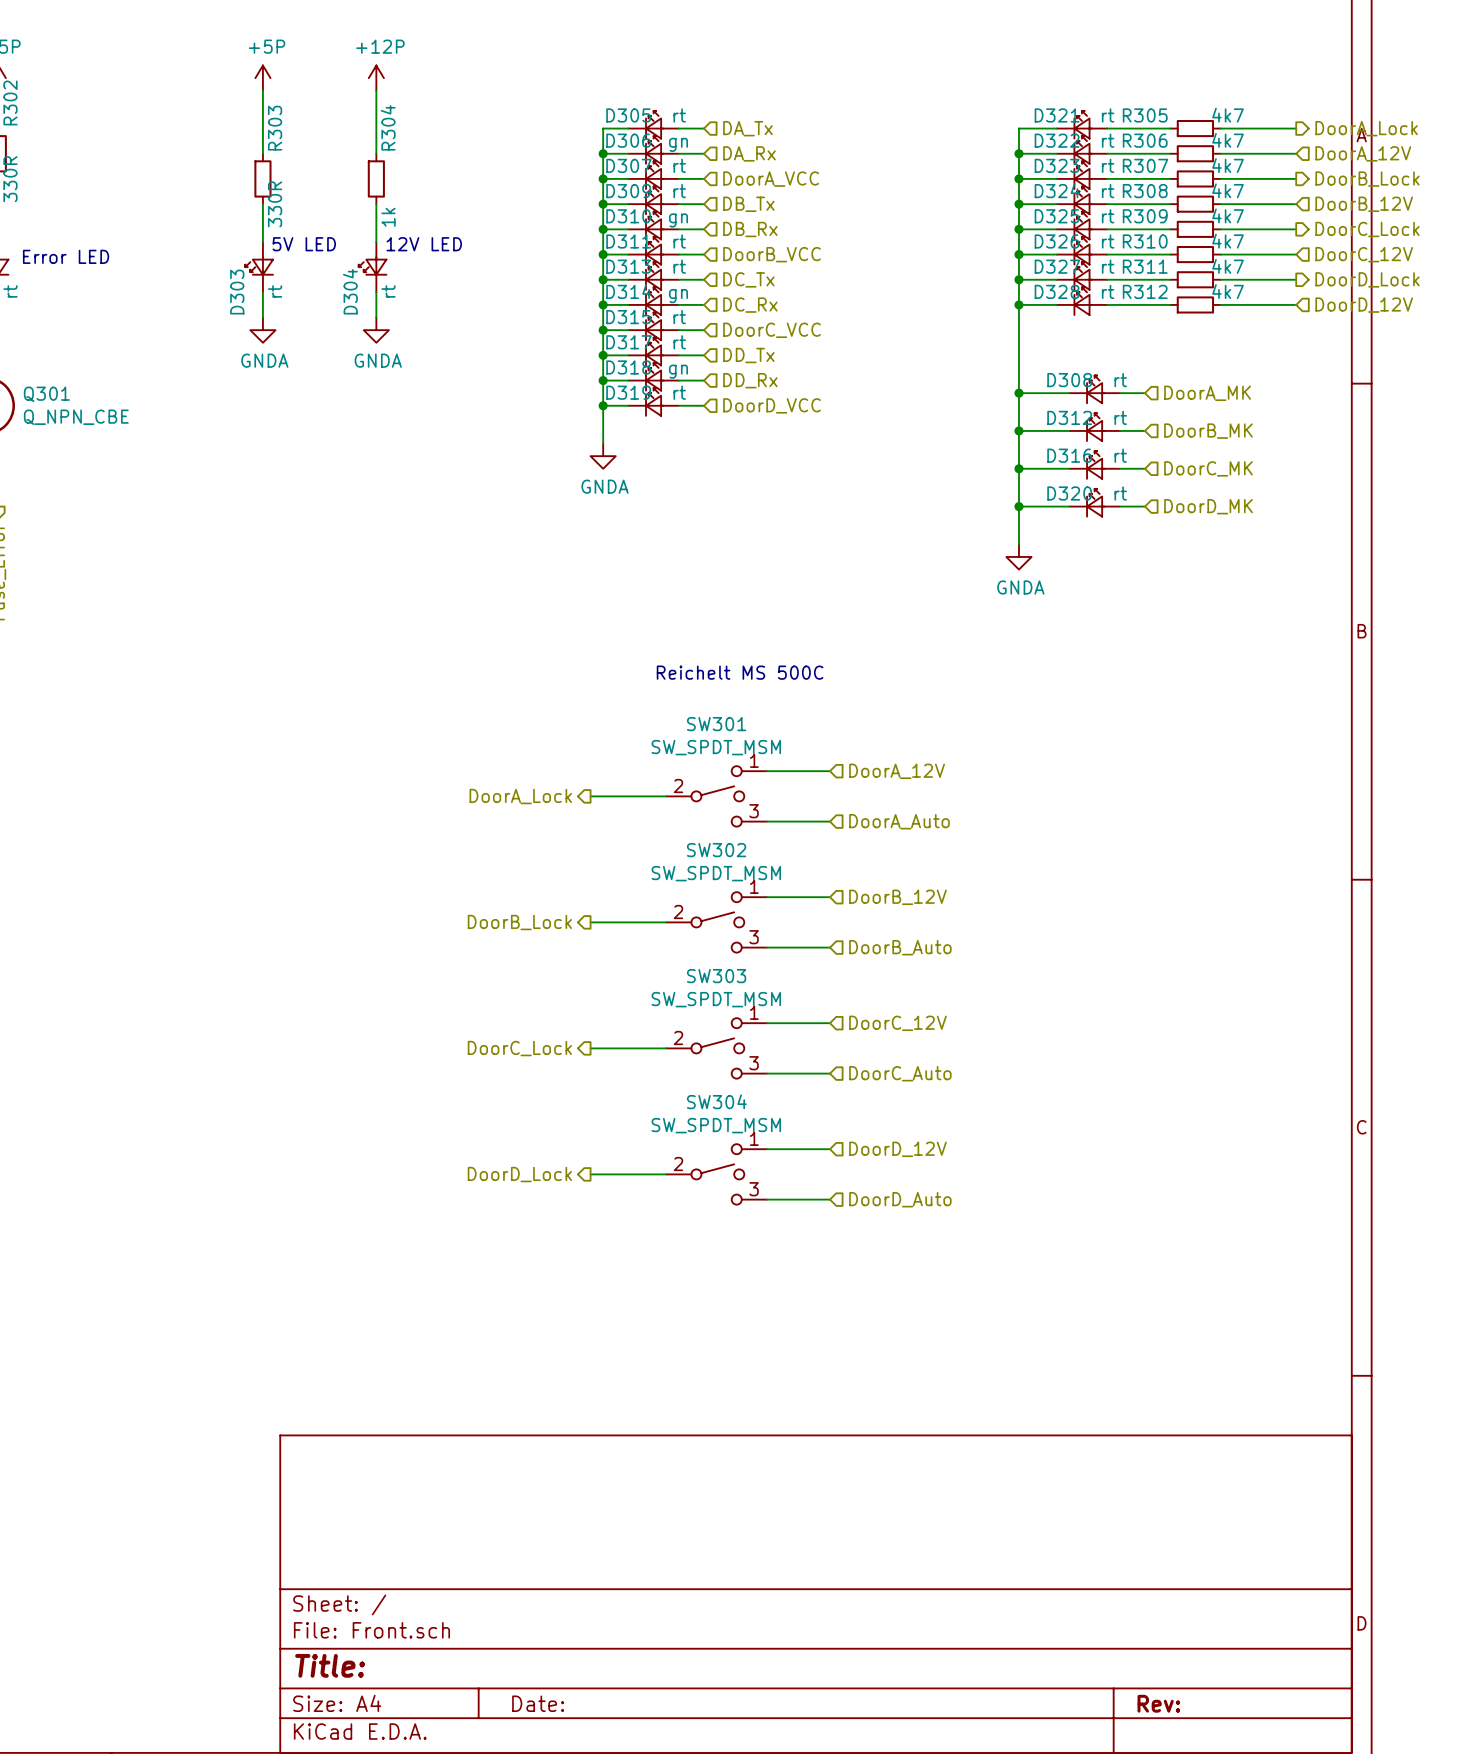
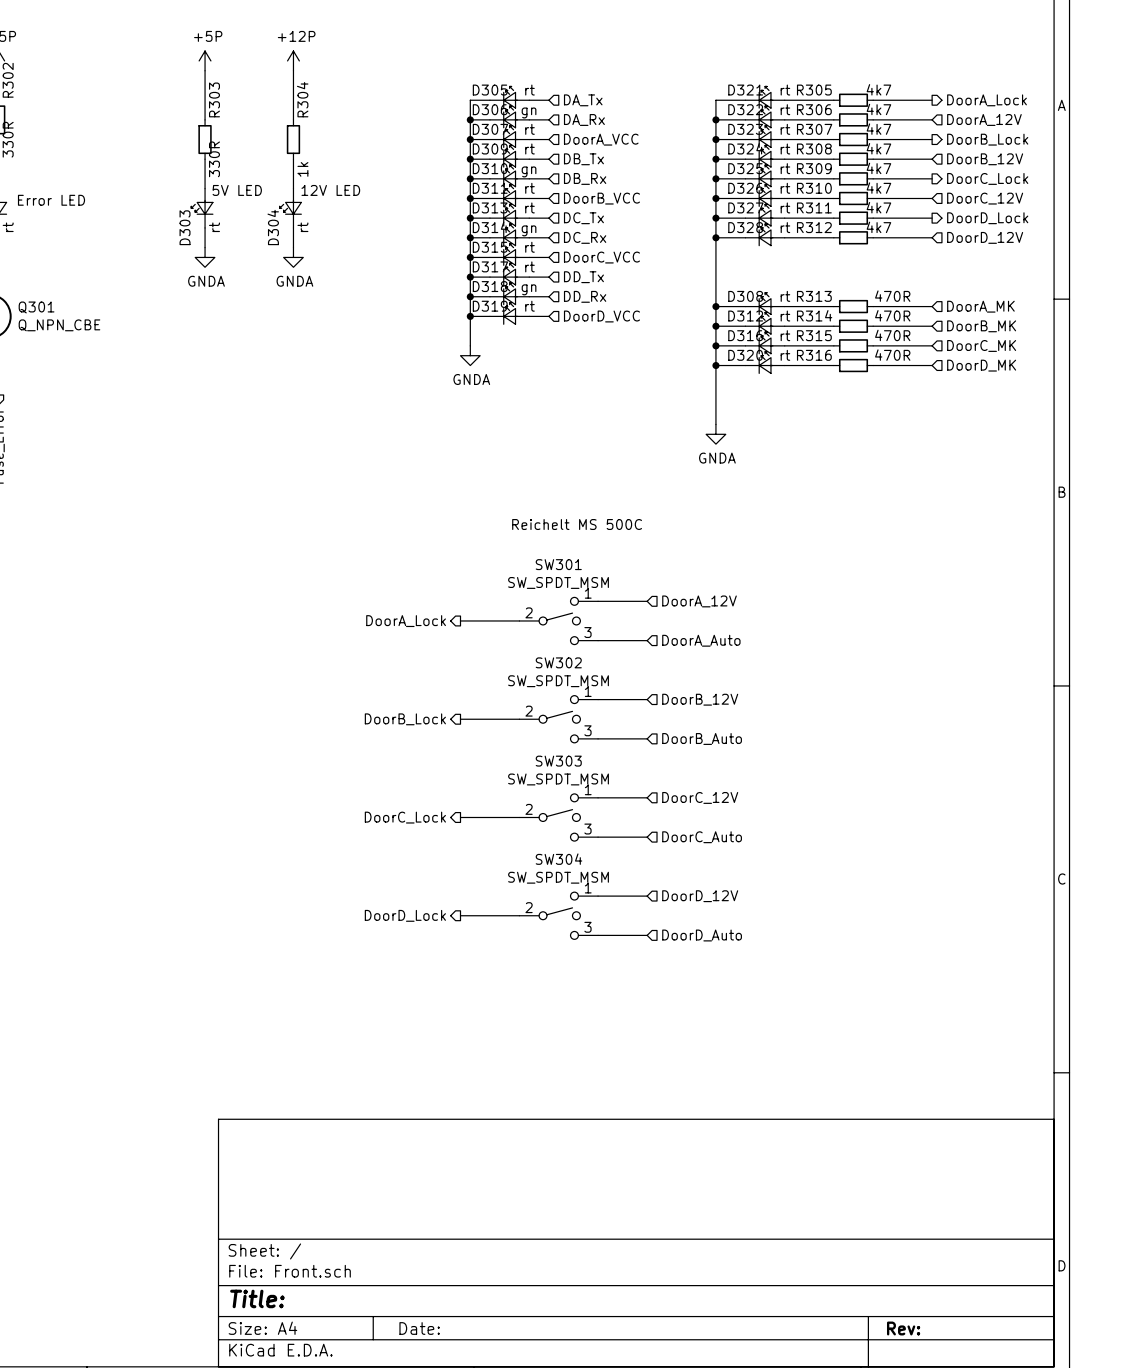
D321 position: (1081, 124) -> (765, 97)
wire: none -> (745, 100) (715, 100) (715, 424)
wire: (1018, 128) (1018, 544) -> (794, 100) (784, 100)
wire: none -> (912, 100) (932, 100)
R305 position: (1195, 128) -> (853, 100)
wire: (1220, 128) (1296, 128) -> none
hierarchical label position: DoorA_Lock (1366, 128) -> DoorA_Lock (987, 100)
D322 position: (1081, 149) -> (765, 116)
wire: none -> (715, 119) (745, 119)
junction: none -> (715, 119)
wire: none -> (784, 119) (794, 119)
junction: (1018, 153) -> none
wire: none -> (912, 119) (932, 119)
R306 position: (1195, 153) -> (853, 119)
wire: (1220, 153) (1296, 153) -> none
hierarchical label position: DoorA_12V (1363, 153) -> DoorA_12V (984, 119)
D323 position: (1081, 175) -> (765, 136)
wire: none -> (715, 139) (745, 139)
junction: none -> (715, 139)
wire: none -> (784, 139) (794, 139)
junction: (1018, 178) -> none
wire: none -> (912, 139) (932, 139)
R307 position: (1195, 178) -> (853, 139)
wire: (1220, 178) (1296, 178) -> none
hierarchical label position: DoorB_Lock (1367, 179) -> DoorB_Lock (987, 139)
D324 position: (1081, 200) -> (765, 156)
wire: none -> (715, 159) (745, 159)
junction: none -> (715, 159)
wire: none -> (784, 159) (794, 159)
junction: (1018, 204) -> none
wire: none -> (912, 159) (932, 159)
R308 position: (1195, 204) -> (853, 159)
wire: (1220, 204) (1296, 204) -> none
hierarchical label position: DoorB_12V (1364, 204) -> DoorB_12V (985, 159)
D325 position: (1081, 225) -> (765, 175)
wire: none -> (715, 178) (745, 178)
junction: none -> (715, 178)
wire: none -> (784, 178) (794, 178)
junction: (1018, 229) -> none
R309 position: (1195, 229) -> (853, 178)
wire: (1220, 229) (1296, 229) -> none
hierarchical label position: DoorC_Lock (1367, 229) -> DoorC_Lock (987, 178)
D326 position: (1081, 250) -> (765, 195)
wire: none -> (715, 198) (745, 198)
junction: none -> (715, 198)
wire: none -> (784, 198) (794, 198)
junction: (1018, 254) -> none
wire: none -> (912, 198) (932, 198)
R310 position: (1195, 254) -> (853, 198)
wire: (1220, 254) (1296, 254) -> (873, 326) (932, 326)
hierarchical label position: DoorC_12V (1364, 254) -> DoorC_12V (985, 198)
D327 position: (1081, 275) -> (765, 215)
wire: none -> (715, 218) (745, 218)
junction: none -> (715, 218)
wire: none -> (784, 218) (794, 218)
junction: (1018, 279) -> none
wire: none -> (912, 218) (932, 218)
R311 position: (1195, 279) -> (853, 218)
wire: (1220, 279) (1296, 279) -> (873, 345) (932, 345)
hierarchical label position: DoorD_Lock (1367, 279) -> DoorD_Lock (987, 218)
D328 position: (1081, 301) -> (765, 234)
wire: none -> (715, 237) (745, 237)
junction: none -> (715, 237)
wire: none -> (784, 237) (794, 237)
junction: (1018, 304) -> none
R312 position: (1195, 304) -> (853, 237)
wire: (1220, 304) (1296, 304) -> none
hierarchical label position: DoorD_12V (1364, 305) -> DoorD_12V (985, 237)
D308 position: (1094, 389) -> (765, 303)
wire: none -> (715, 306) (745, 306)
junction: none -> (715, 306)
wire: none -> (784, 306) (794, 306)
junction: (1018, 393) -> none
R313: none -> 470R (853, 306)
hierarchical label position: DoorA_MK (1207, 393) -> DoorA_MK (980, 306)
wire: none -> (715, 326) (745, 326)
junction: none -> (715, 326)
wire: none -> (784, 326) (833, 326)
R314: none -> 470R (853, 326)
D312 position: (1094, 427) -> (765, 323)
wire: (1018, 430) (1069, 430) -> (892, 306) (932, 306)
junction: (1018, 430) -> none
wire: (1119, 430) (1144, 430) -> (912, 178) (932, 178)
hierarchical label position: DoorB_MK (1208, 431) -> DoorB_MK (981, 326)
wire: none -> (715, 345) (745, 345)
junction: none -> (715, 345)
wire: none -> (784, 345) (833, 345)
R315: none -> 470R (853, 345)
D316 position: (1094, 464) -> (765, 342)
wire: none -> (715, 365) (745, 365)
junction: none -> (715, 365)
wire: none -> (784, 365) (794, 365)
junction: (1018, 468) -> none
R316: none -> 470R (853, 365)
hierarchical label position: DoorC_MK (1208, 468) -> DoorC_MK (981, 345)
D320 position: (1094, 502) -> (765, 362)
wire: (1018, 506) (1069, 506) -> (892, 365) (932, 365)
junction: (1018, 506) -> none
wire: (1119, 506) (1144, 506) -> (912, 237) (932, 237)
hierarchical label position: DoorD_MK (1208, 506) -> DoorD_MK (981, 365)
power symbol position: GNDA (1018, 556) -> GNDA (715, 434)

